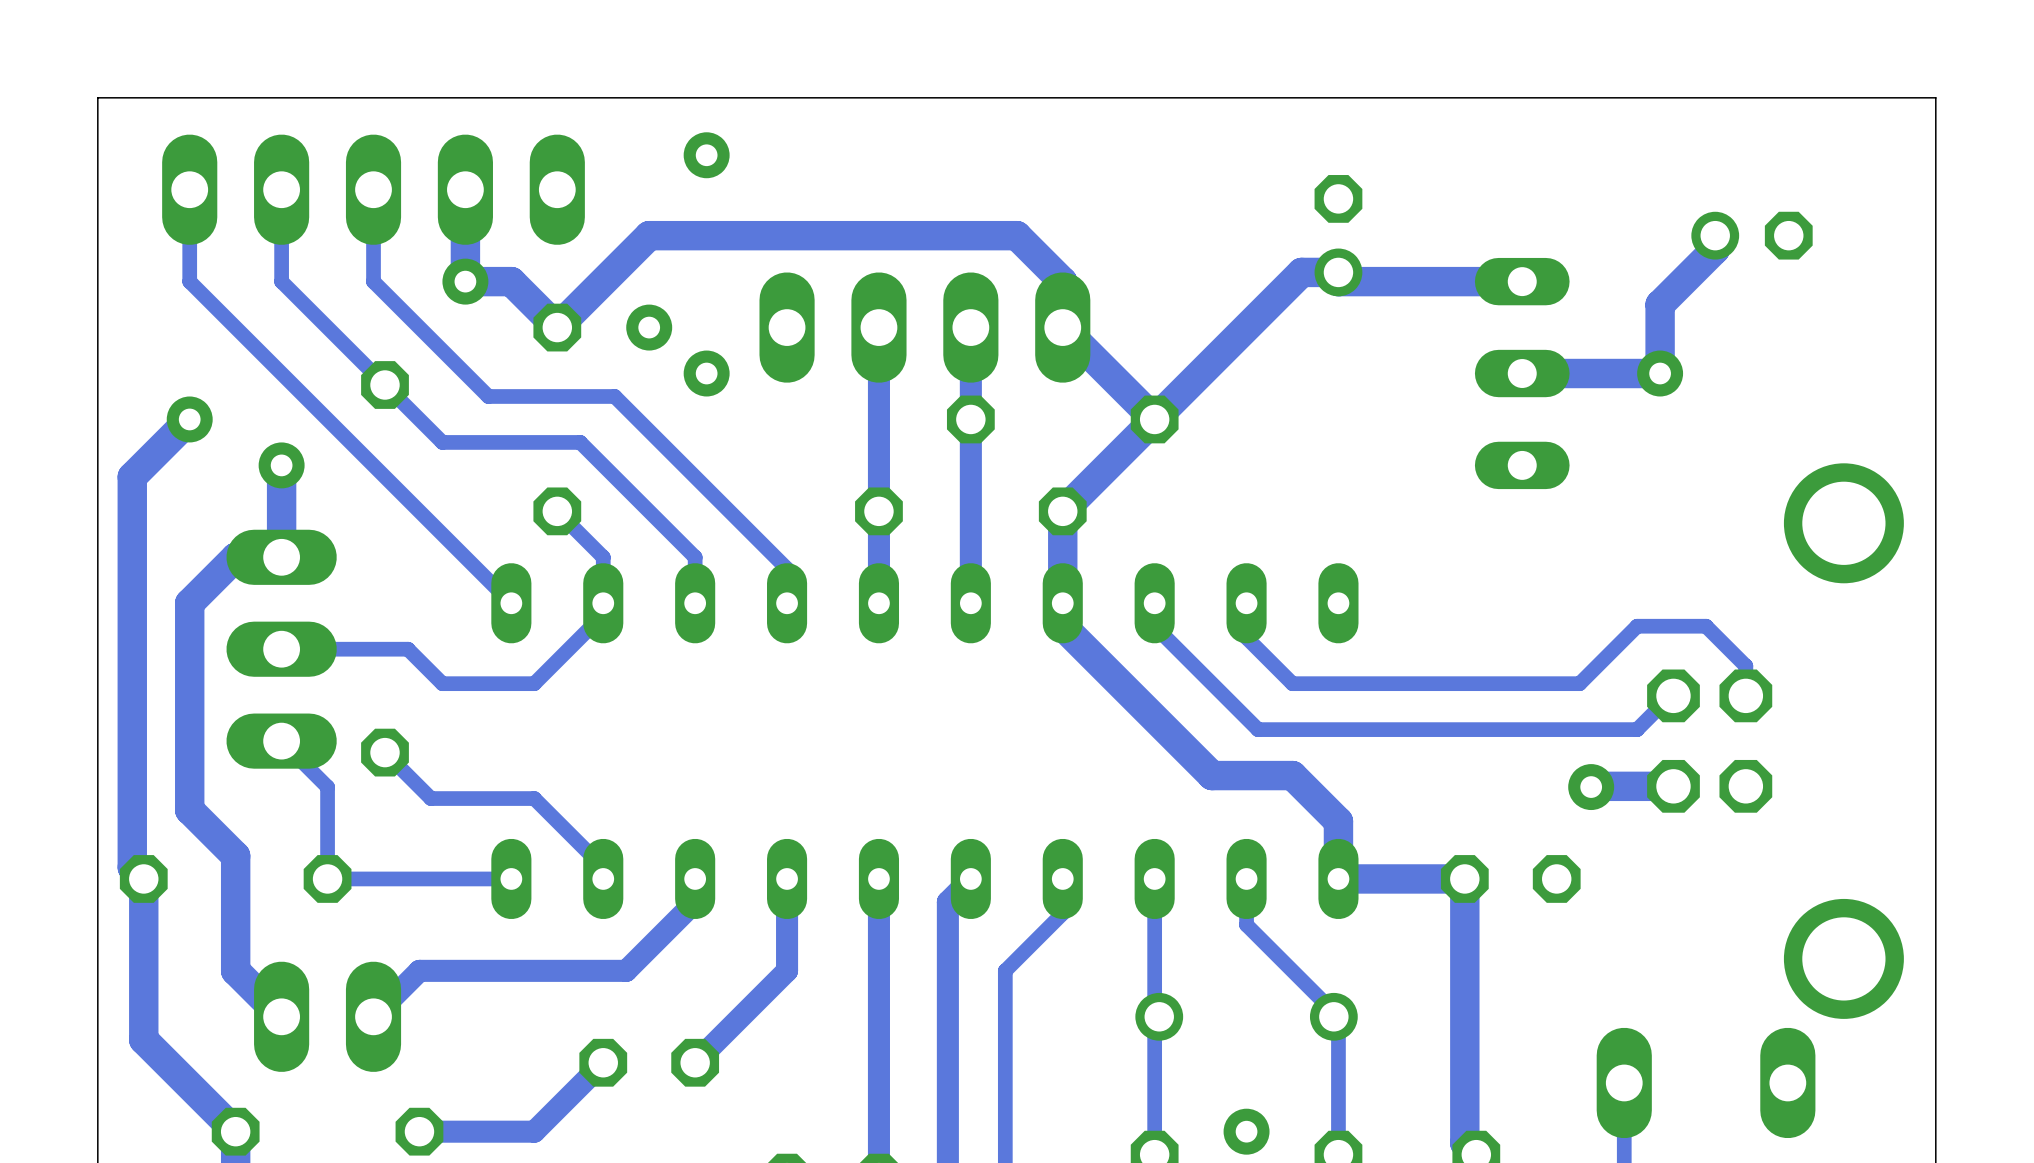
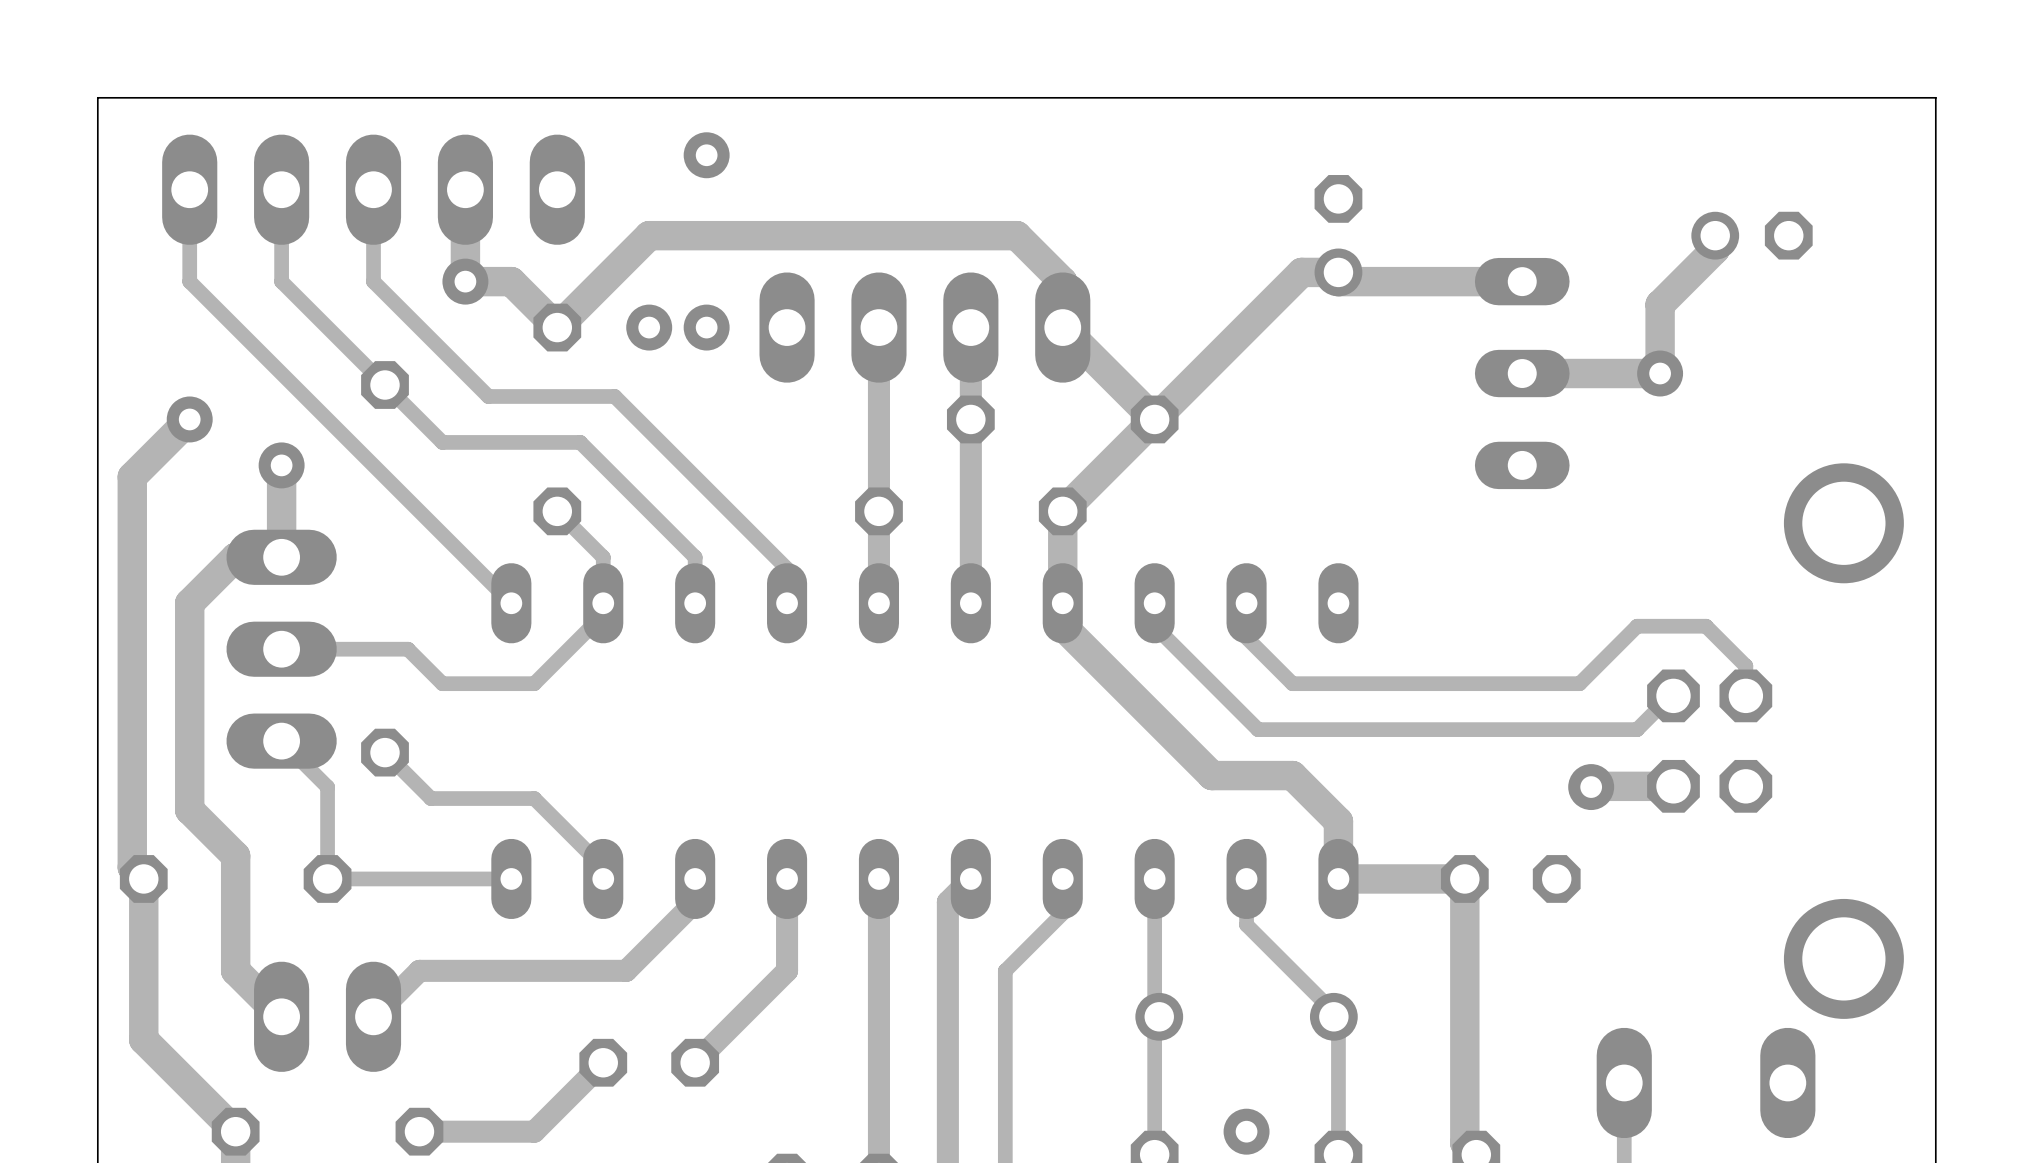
via position: (706, 373) -> (706, 327)

